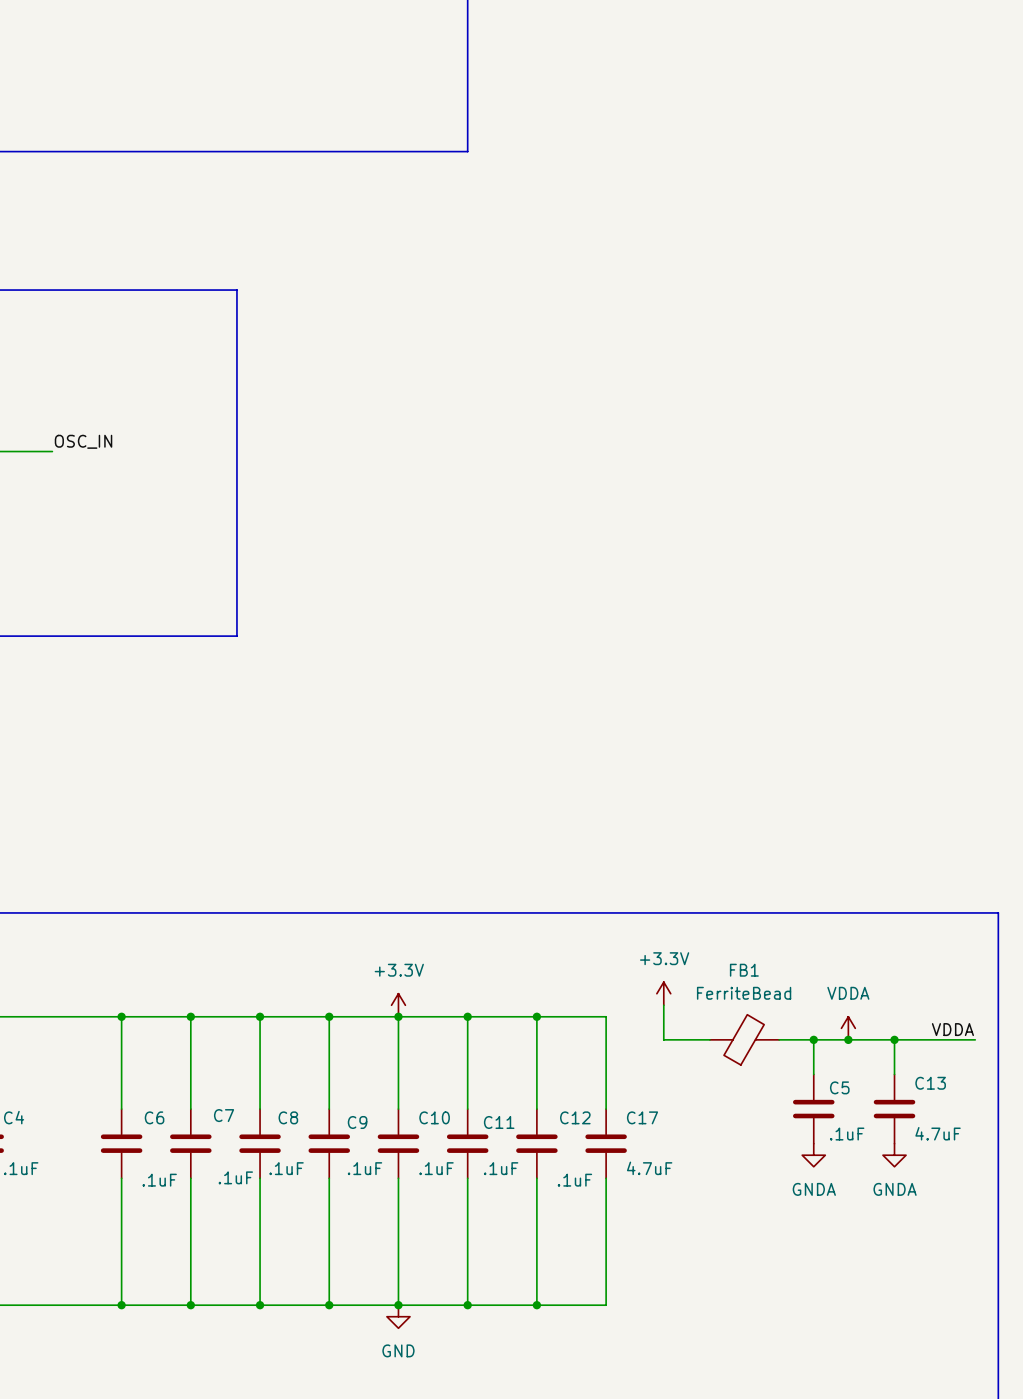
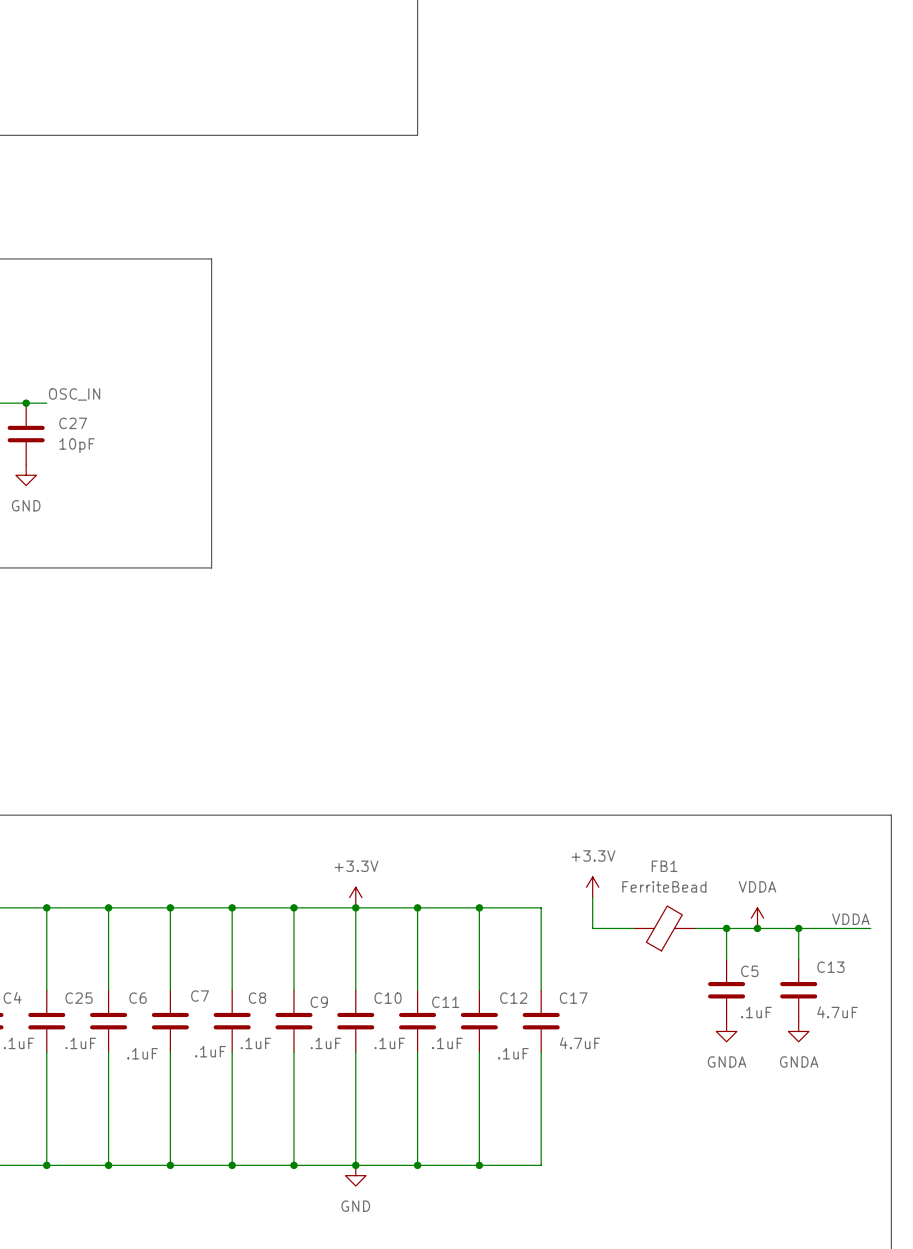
junction: none -> (26, 403)
C27: none -> 10pF (26, 434)
power symbol: none -> GND (26, 475)
wire: none -> (46, 907) (46, 990)
junction: none -> (46, 907)
C25: none -> .1uF (46, 1021)
wire: none -> (46, 1052) (46, 1165)
junction: none -> (46, 1165)

